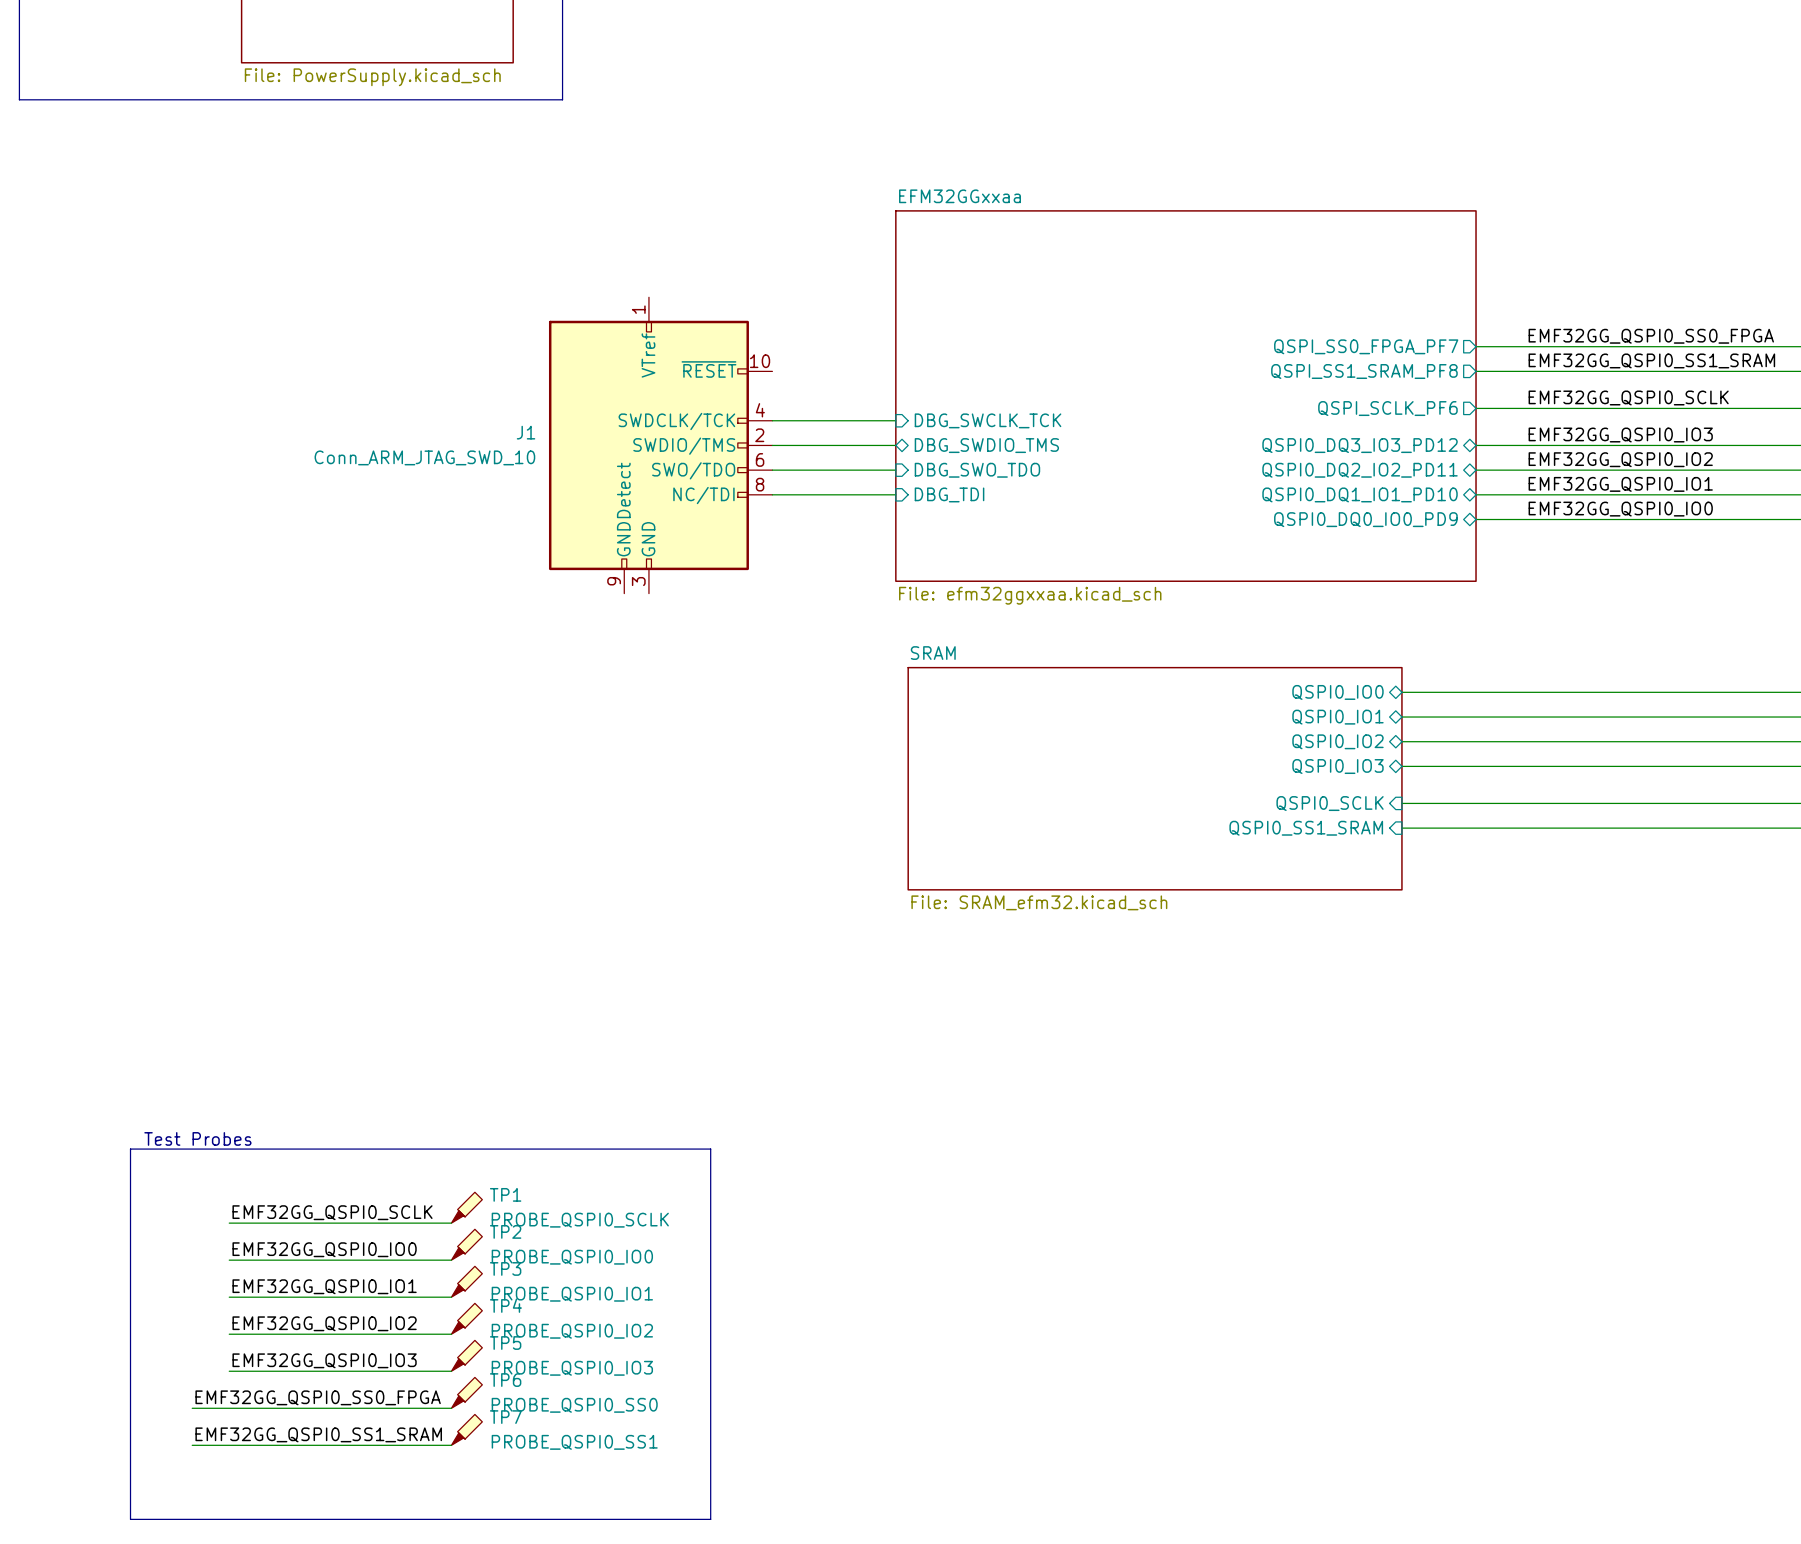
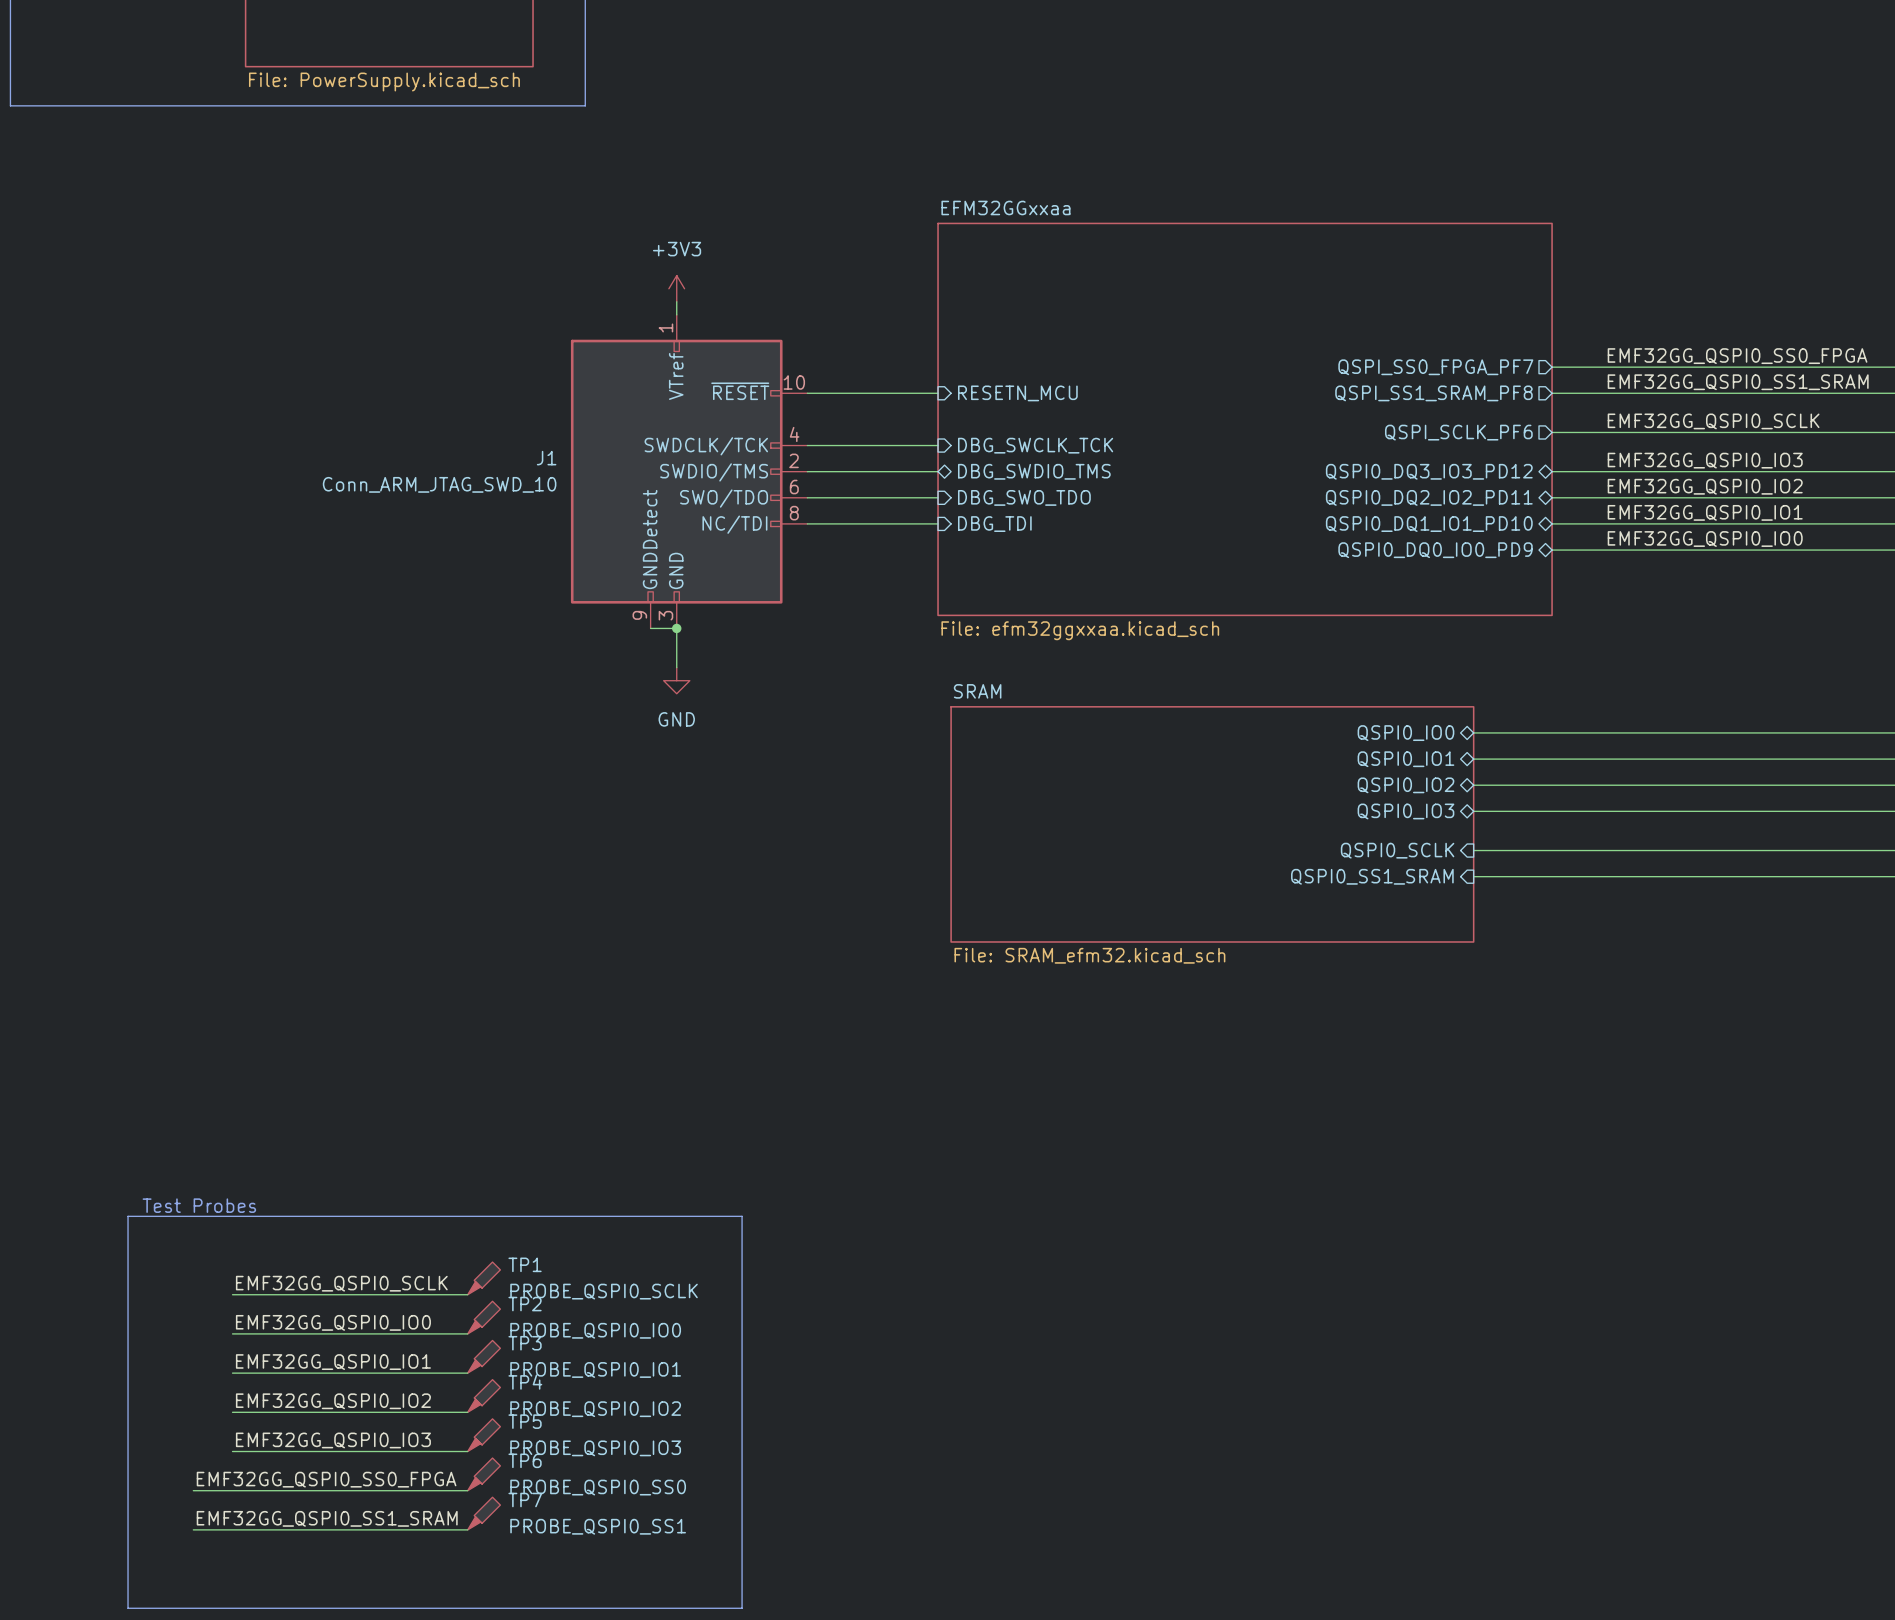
power symbol: none -> +3V3 (676, 288)
wire: none -> (676, 301) (676, 314)
wire: none -> (807, 393) (938, 393)
sheet pin: none -> RESETN_MCU (1017, 393)
wire: none -> (650, 628) (676, 628) (676, 667)
junction: none -> (676, 628)
power symbol: none -> GND (676, 680)

